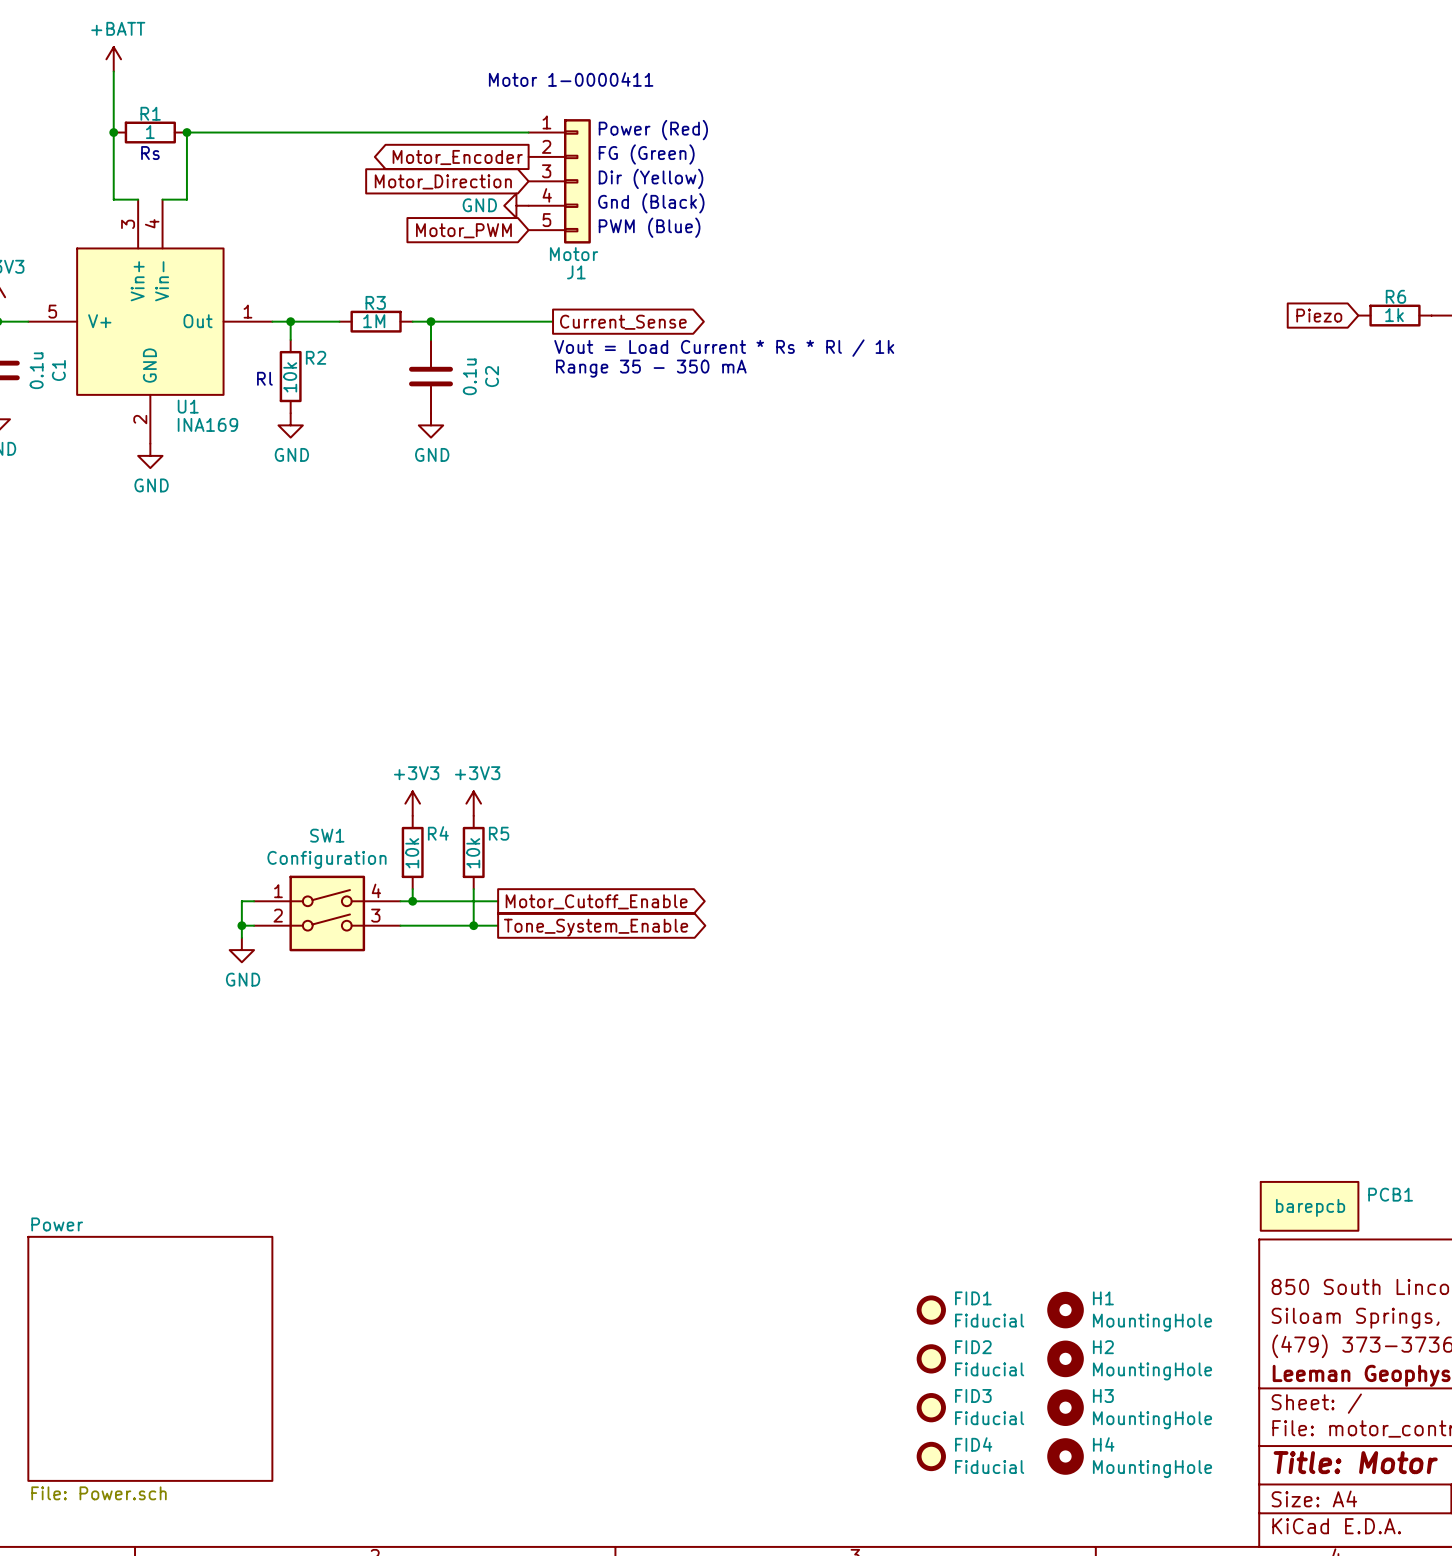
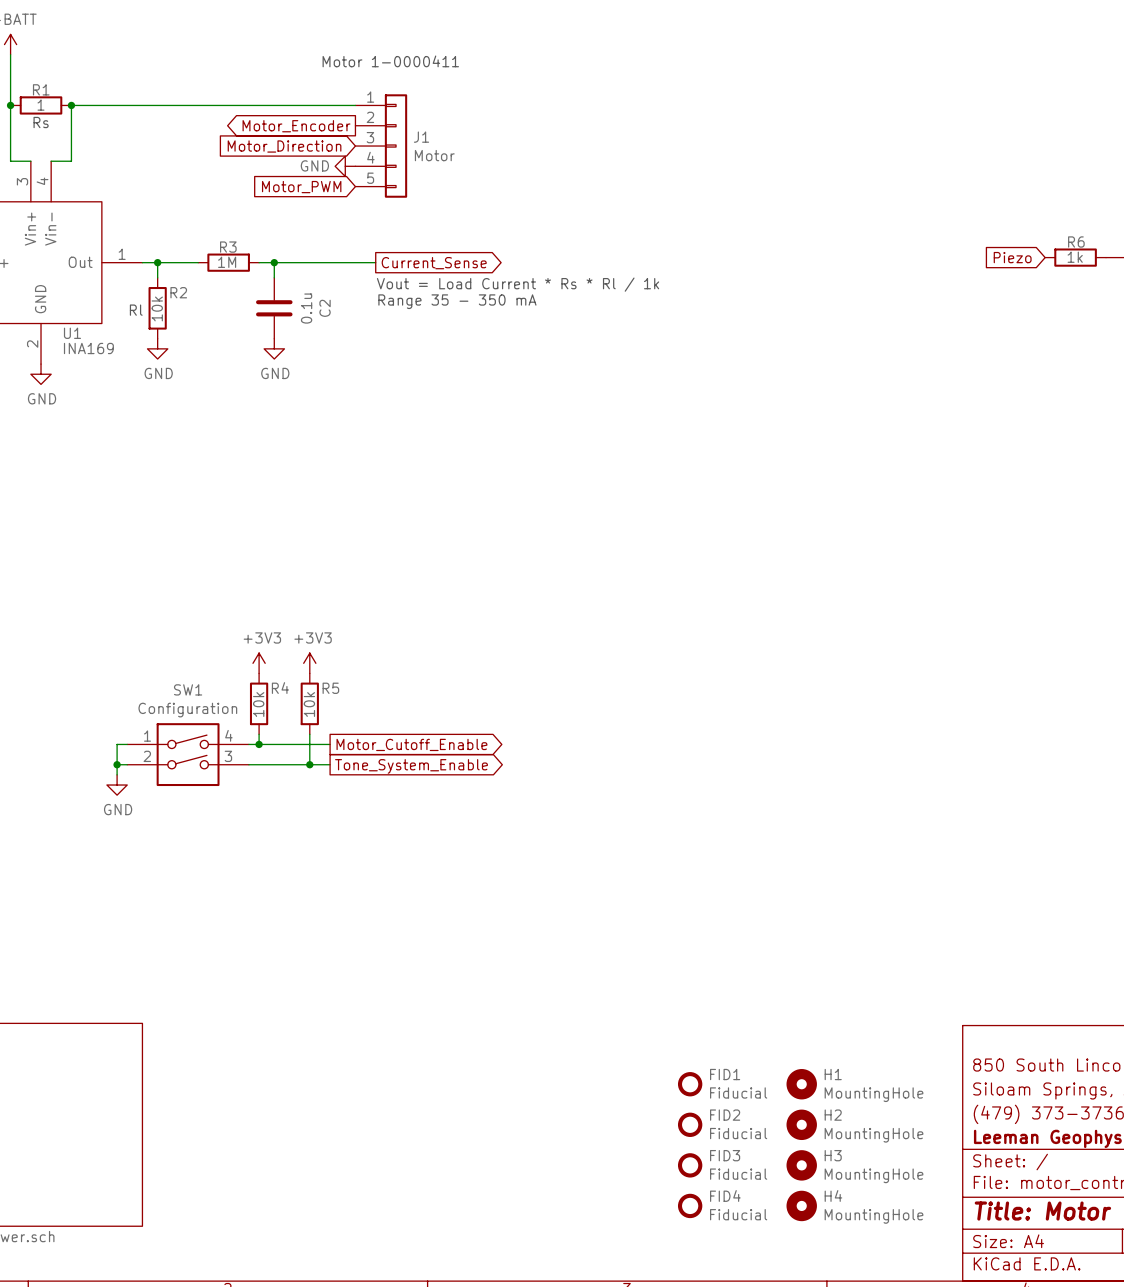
text: Power (Red) (653, 130) -> none
text: FG (Green) (646, 154) -> none
text: Dir (Yellow) (651, 178) -> none
text: Gnd (Black) (651, 203) -> none
text: PWM (Blue) (649, 227) -> none
J1 value position: Motor (574, 254) -> Motor (434, 155)
J1 name position: J1 (576, 272) -> J1 (421, 137)
PCB1: barepcb (1309, 1206) -> none

